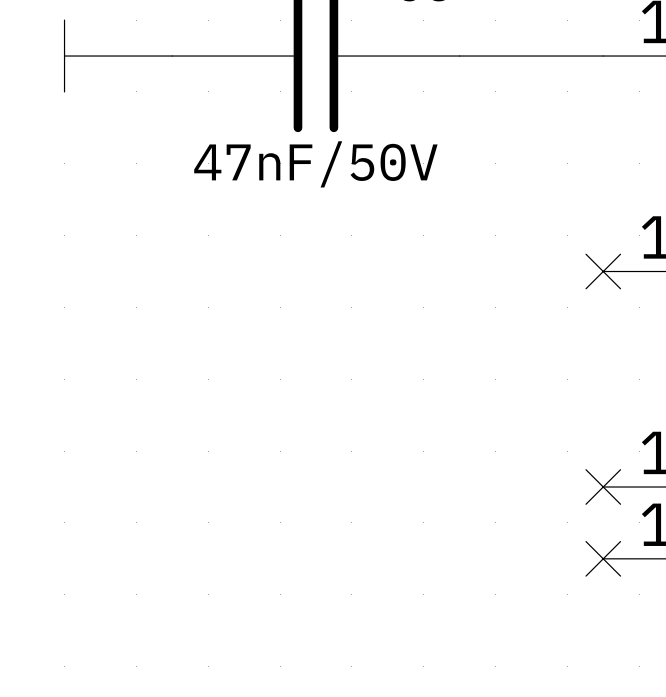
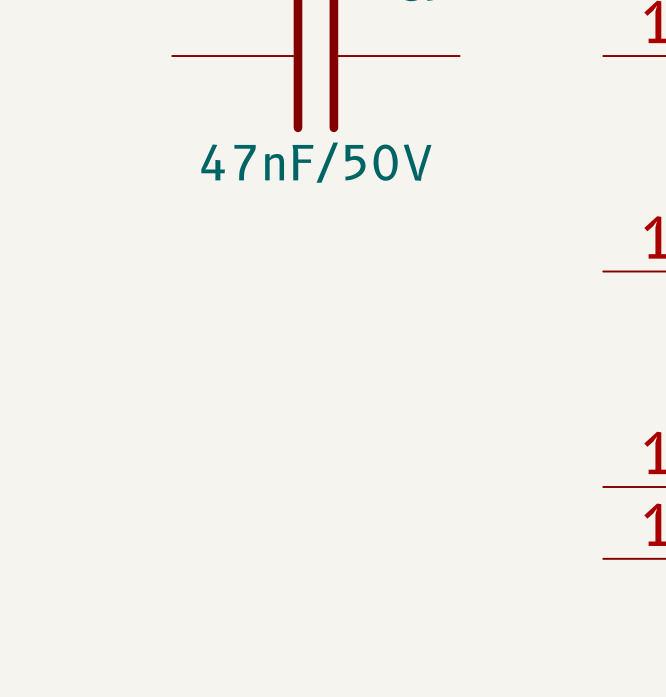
wire: (64, 56) (172, 56) -> none
power symbol: (64, 56) -> none
wire: (459, 56) (603, 56) -> none
no-connect mark: (603, 271) -> none
no-connect mark: (603, 487) -> none
no-connect mark: (603, 558) -> none

